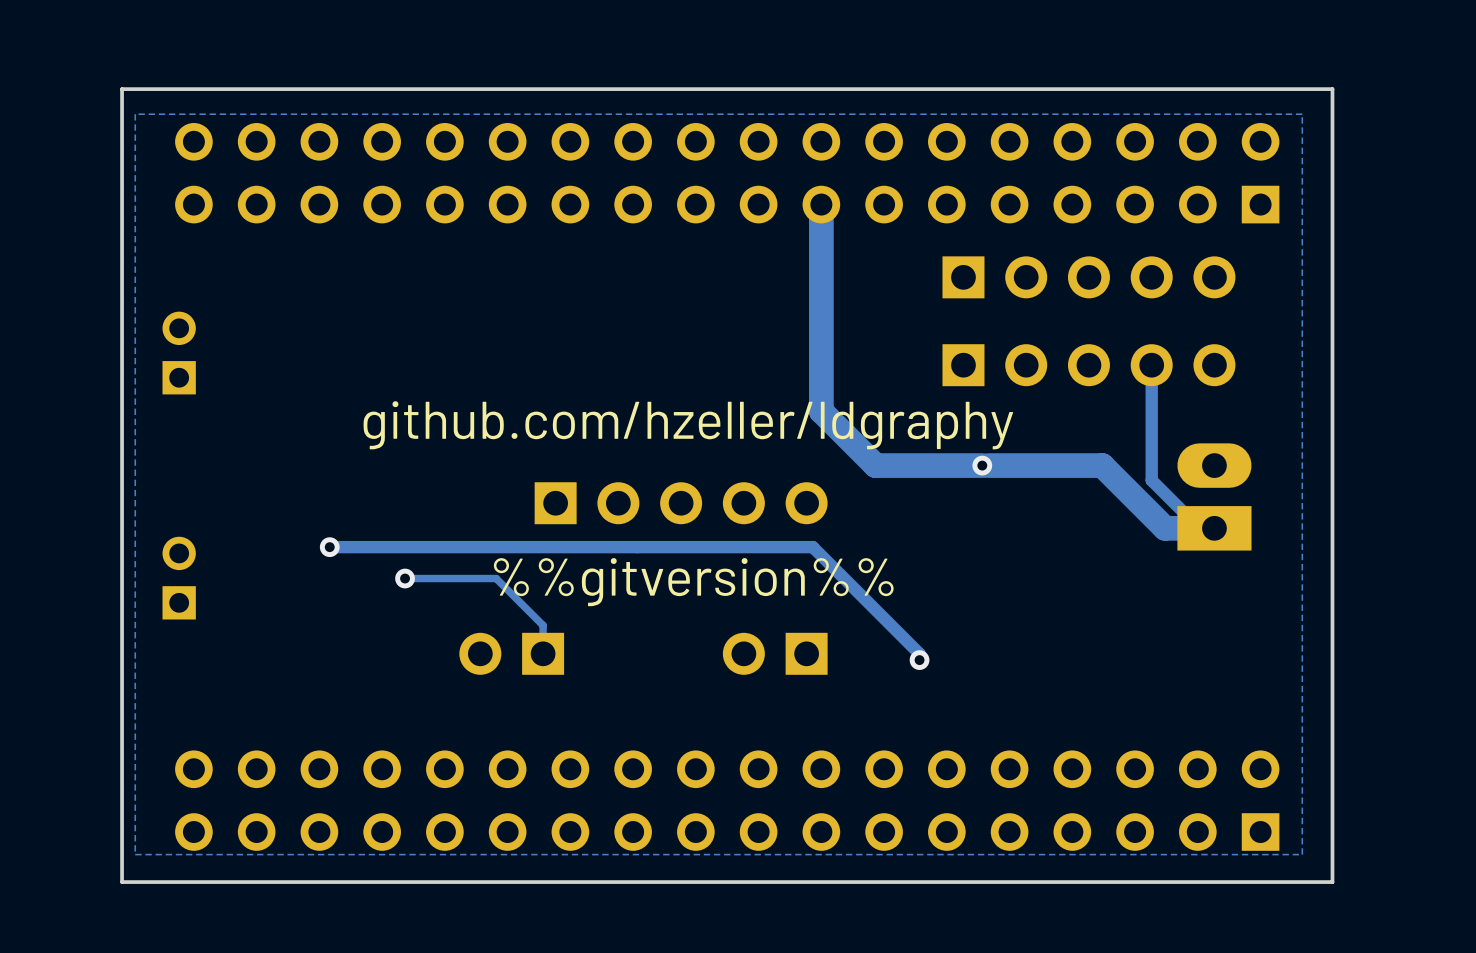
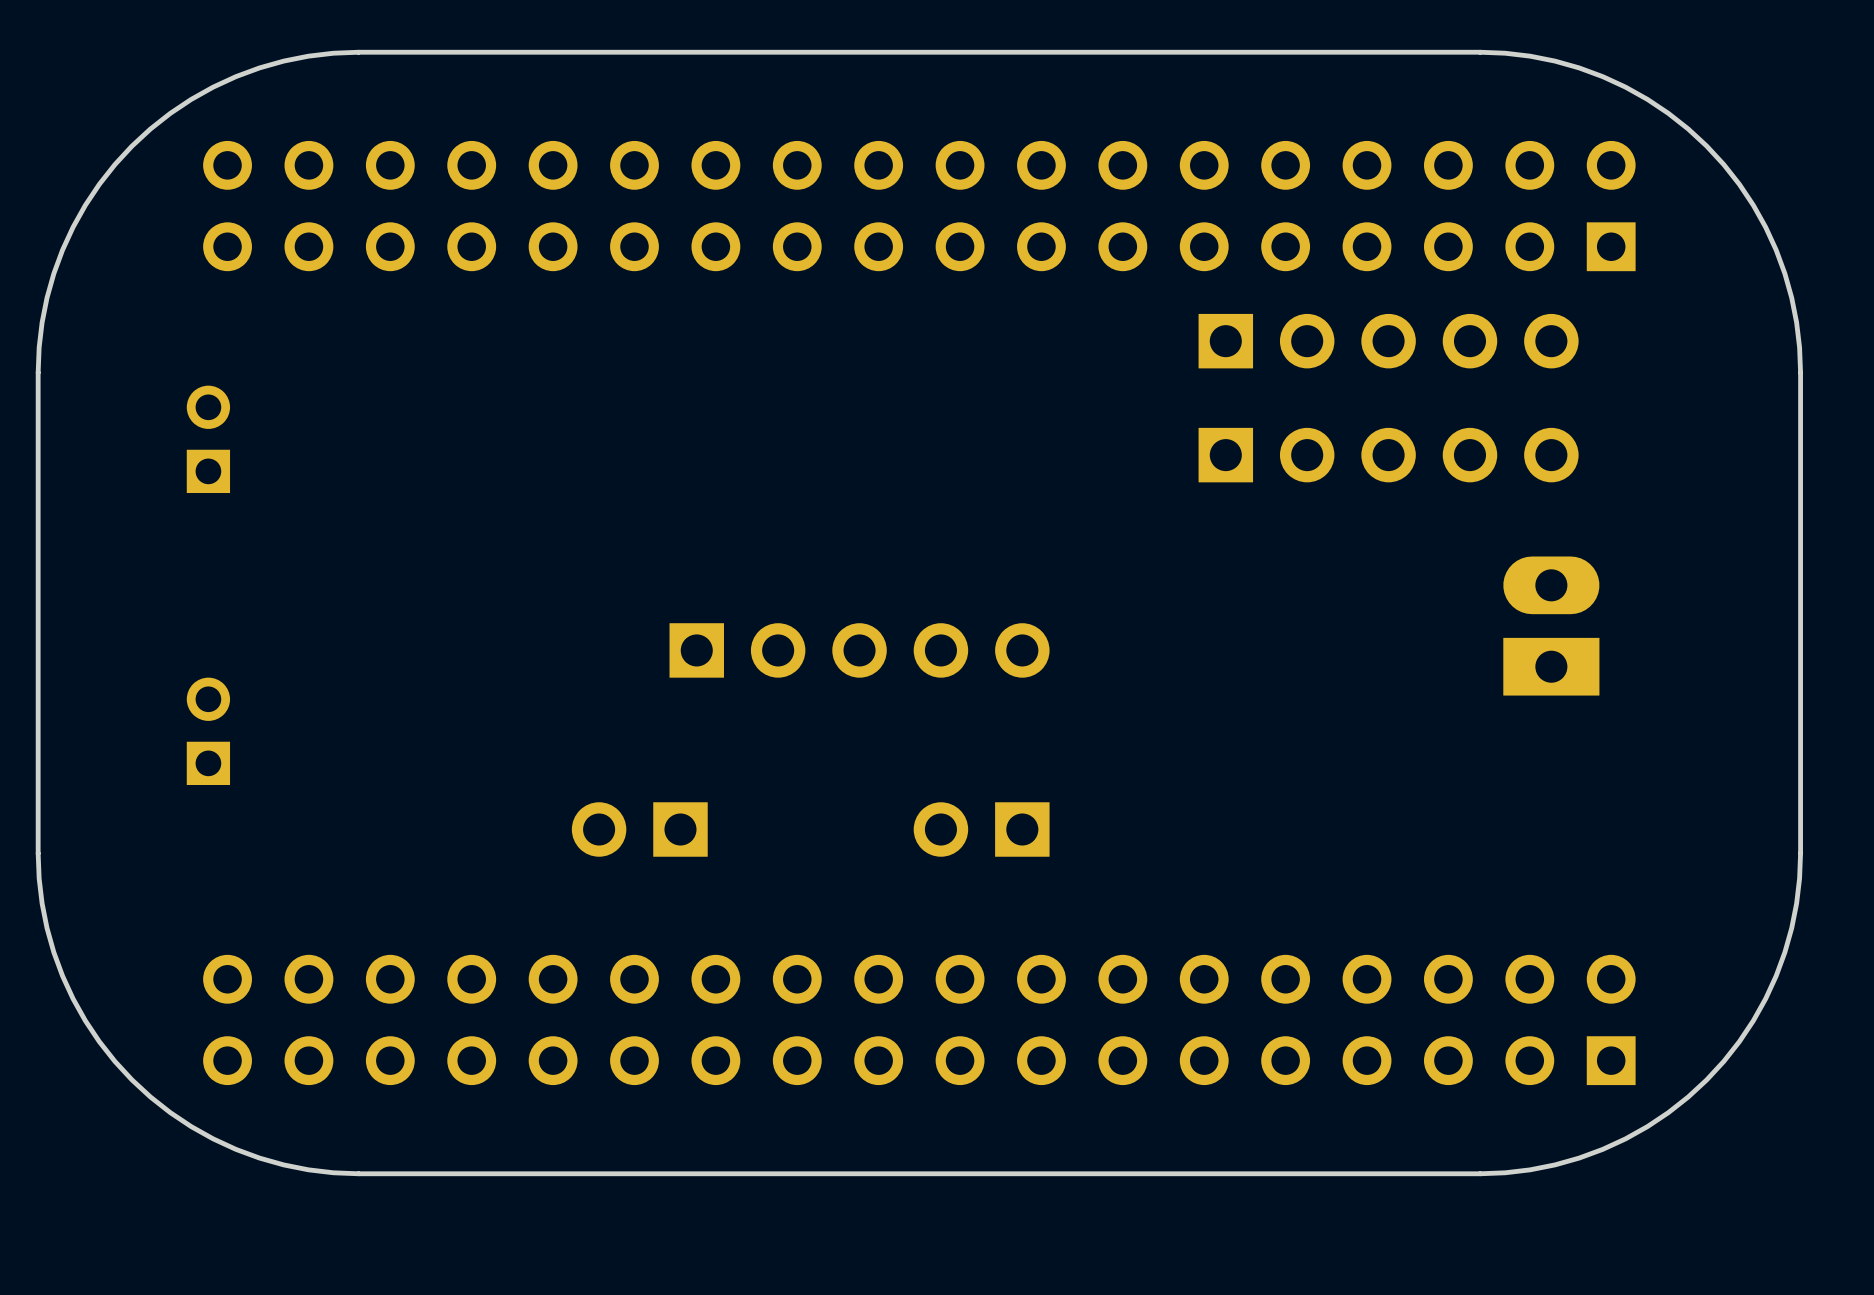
board edge: (1332, 89) (1332, 882) (122, 882) (122, 89) (1332, 89) -> (1480, 52) (1530, 56) (1579, 67) (1602, 76) (1647, 99) (1688, 129) (1723, 164) (1753, 205) (1776, 250) (1791, 297) (1796, 322) (1800, 372) (1800, 853) (1796, 903) (1784, 952) (1776, 975) (1753, 1020) (1739, 1041) (1706, 1079) (1668, 1112) (1625, 1138) (1579, 1158) (1554, 1164) (1505, 1172) (333, 1172) (308, 1169) (259, 1158) (235, 1149) (191, 1126) (150, 1096) (114, 1061) (99, 1041) (73, 998) (62, 975) (47, 928) (39, 878) (39, 347) (42, 322) (53, 273) (73, 227) (99, 184) (114, 164) (150, 129) (170, 113) (191, 99) (235, 76) (283, 61) (333, 53) (1480, 52)
zone outline: (1302, 114) (135, 114) (135, 854) (1302, 854) (1302, 114) -> none
track: (821, 204) (821, 411) (875, 465) (1102, 465) (1165, 528) (1214, 528) (1199, 528) (1151, 480) (1151, 365) -> none
text: github.com/hzeller/ldgraphy (688, 425) -> none
via: (982, 465) -> none
part position: (681, 503) -> (859, 650)
track: (329, 547) (812, 547) (919, 653) (919, 660) -> none
via: (329, 547) -> none
track: (405, 578) (496, 578) (543, 625) (543, 653) -> none
via: (405, 578) -> none
text: %%gitversion%% (693, 582) -> none
via: (919, 660) -> none

